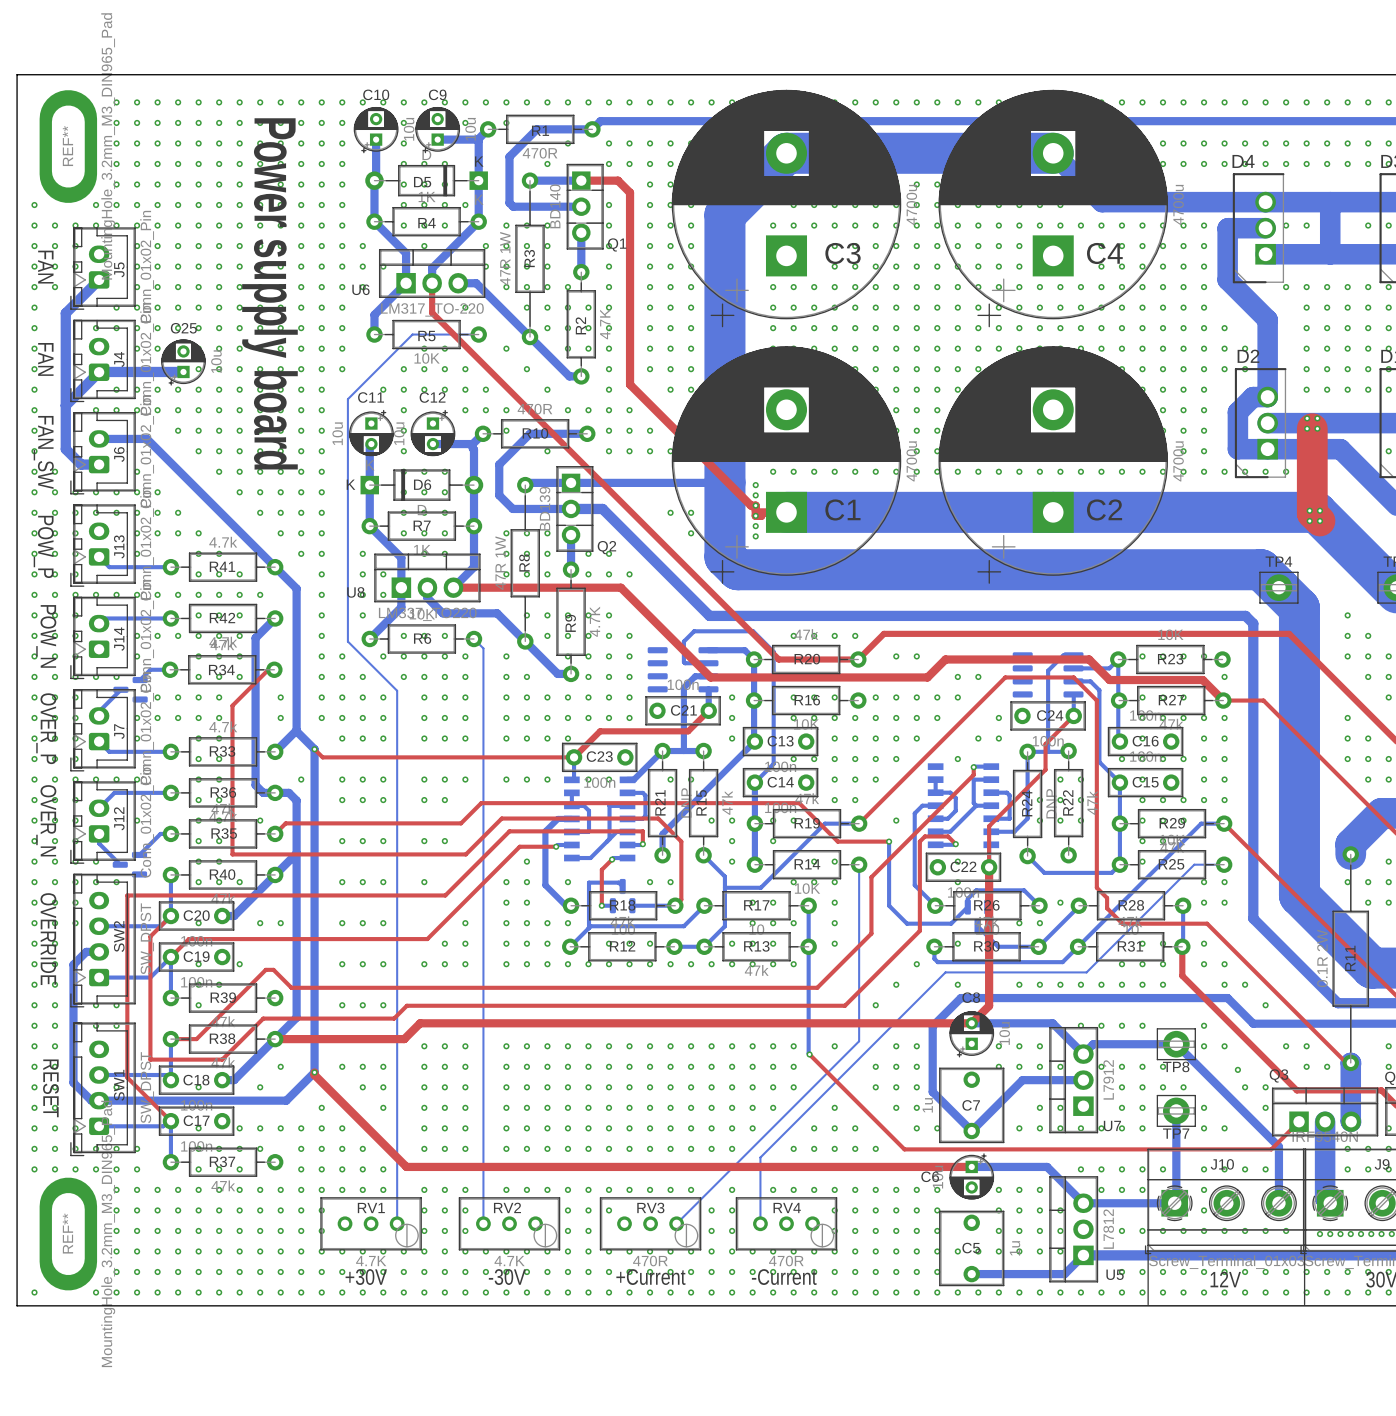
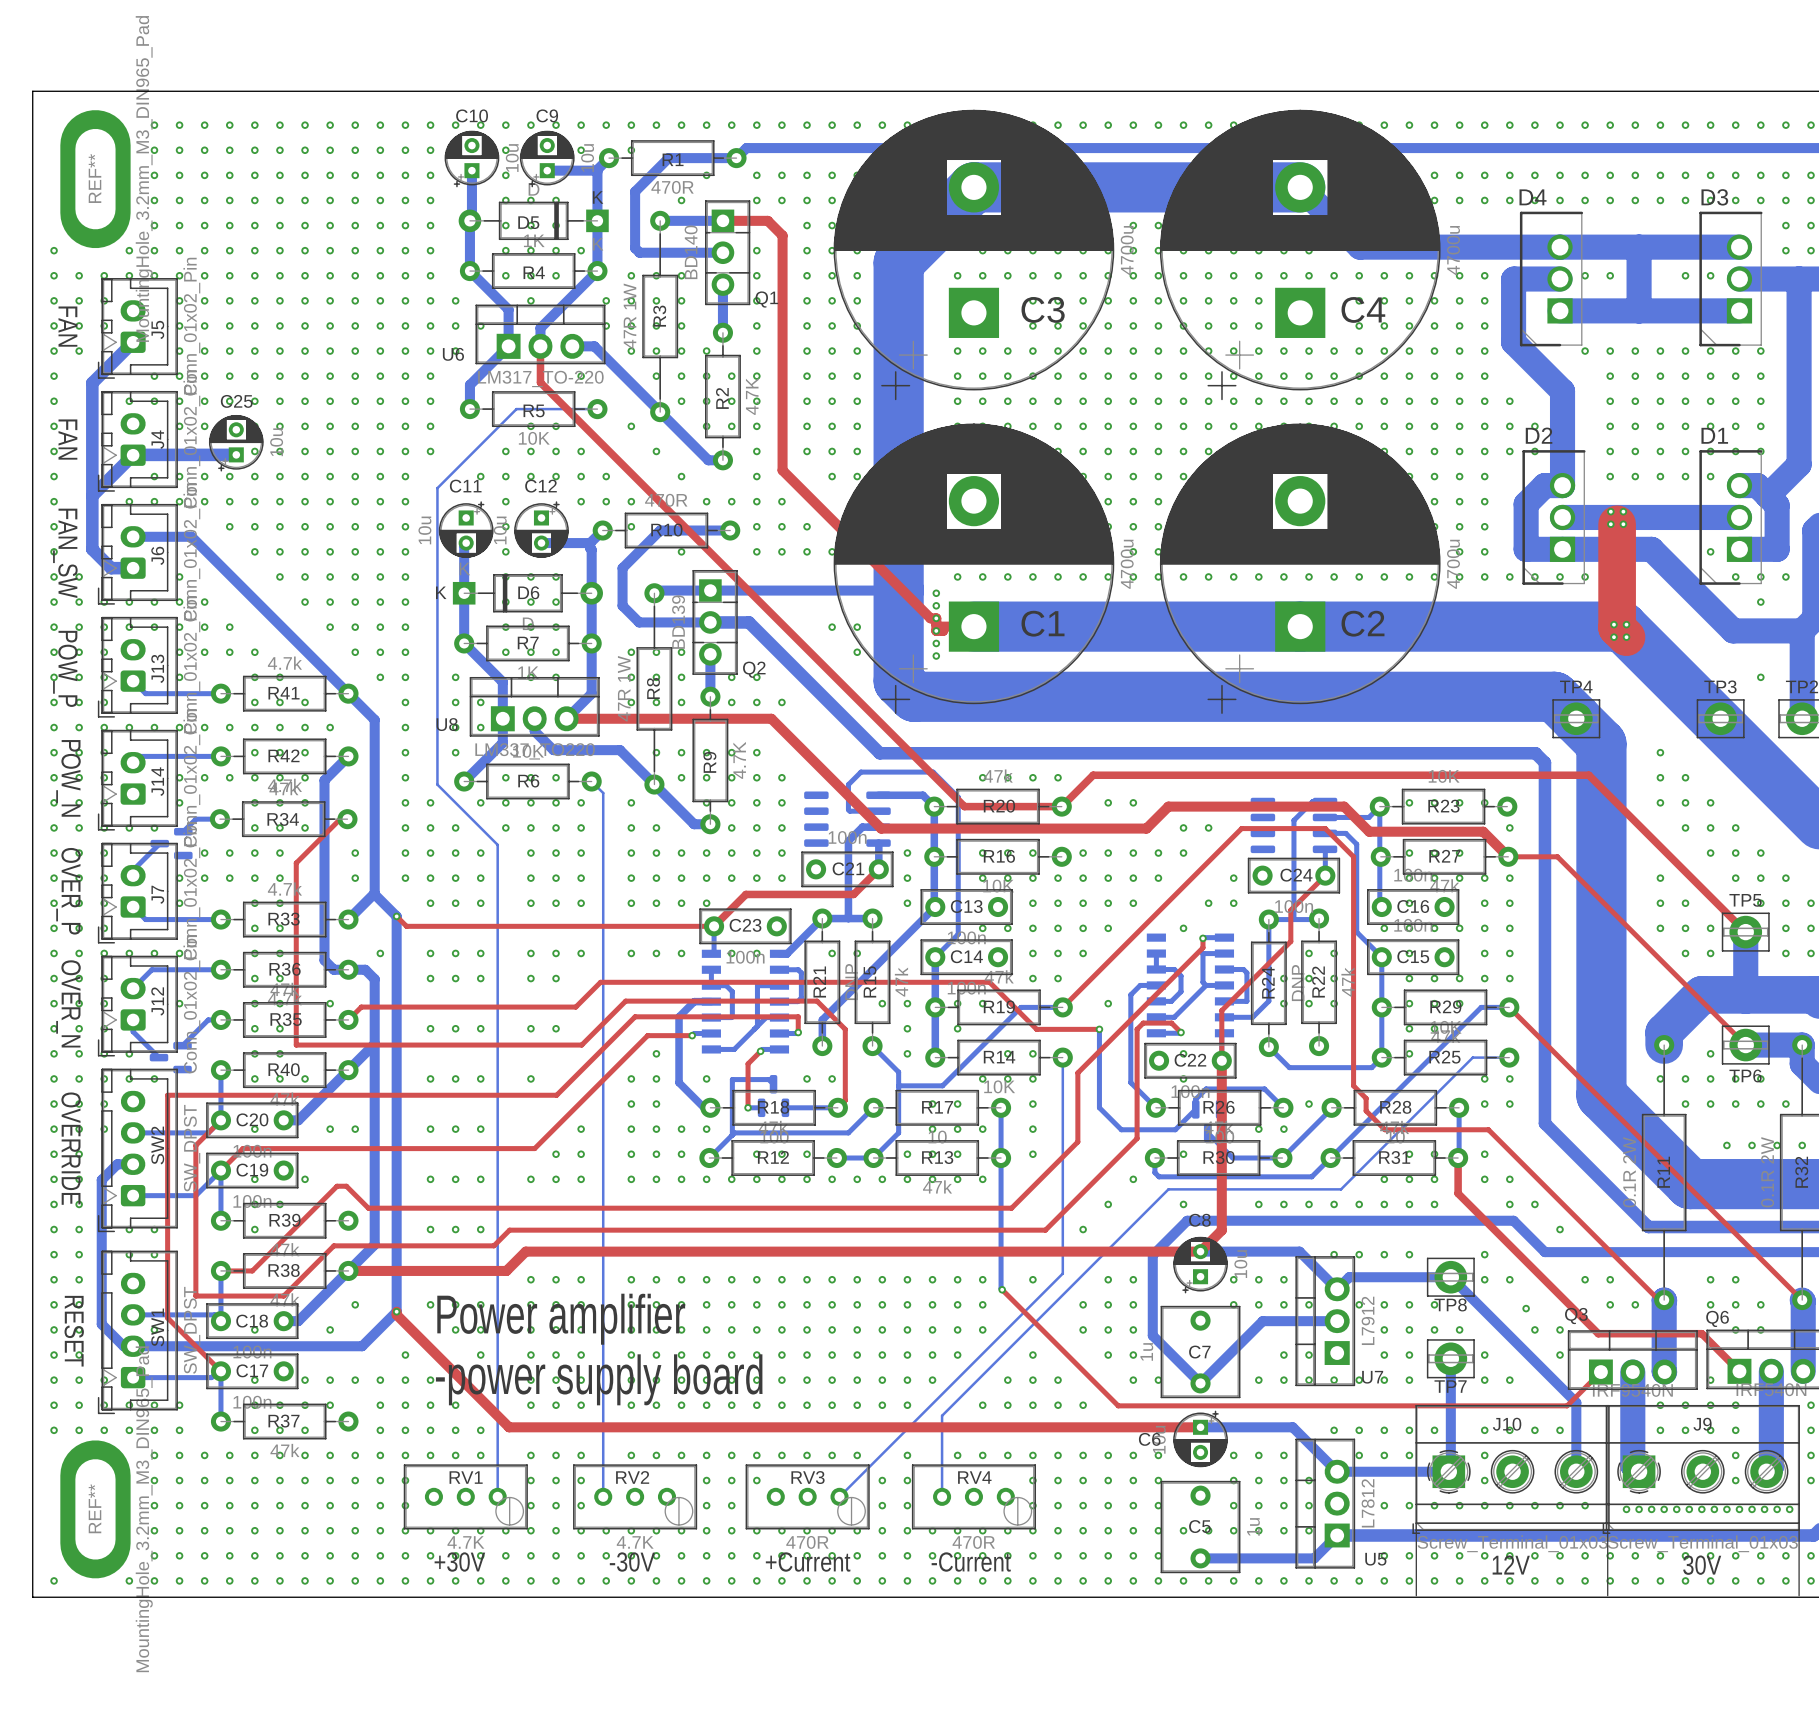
text: Power supply board (269, 293) -> none
text: none -> Power amplifier (561, 1319)
text: none -> -power supply board (599, 1379)

